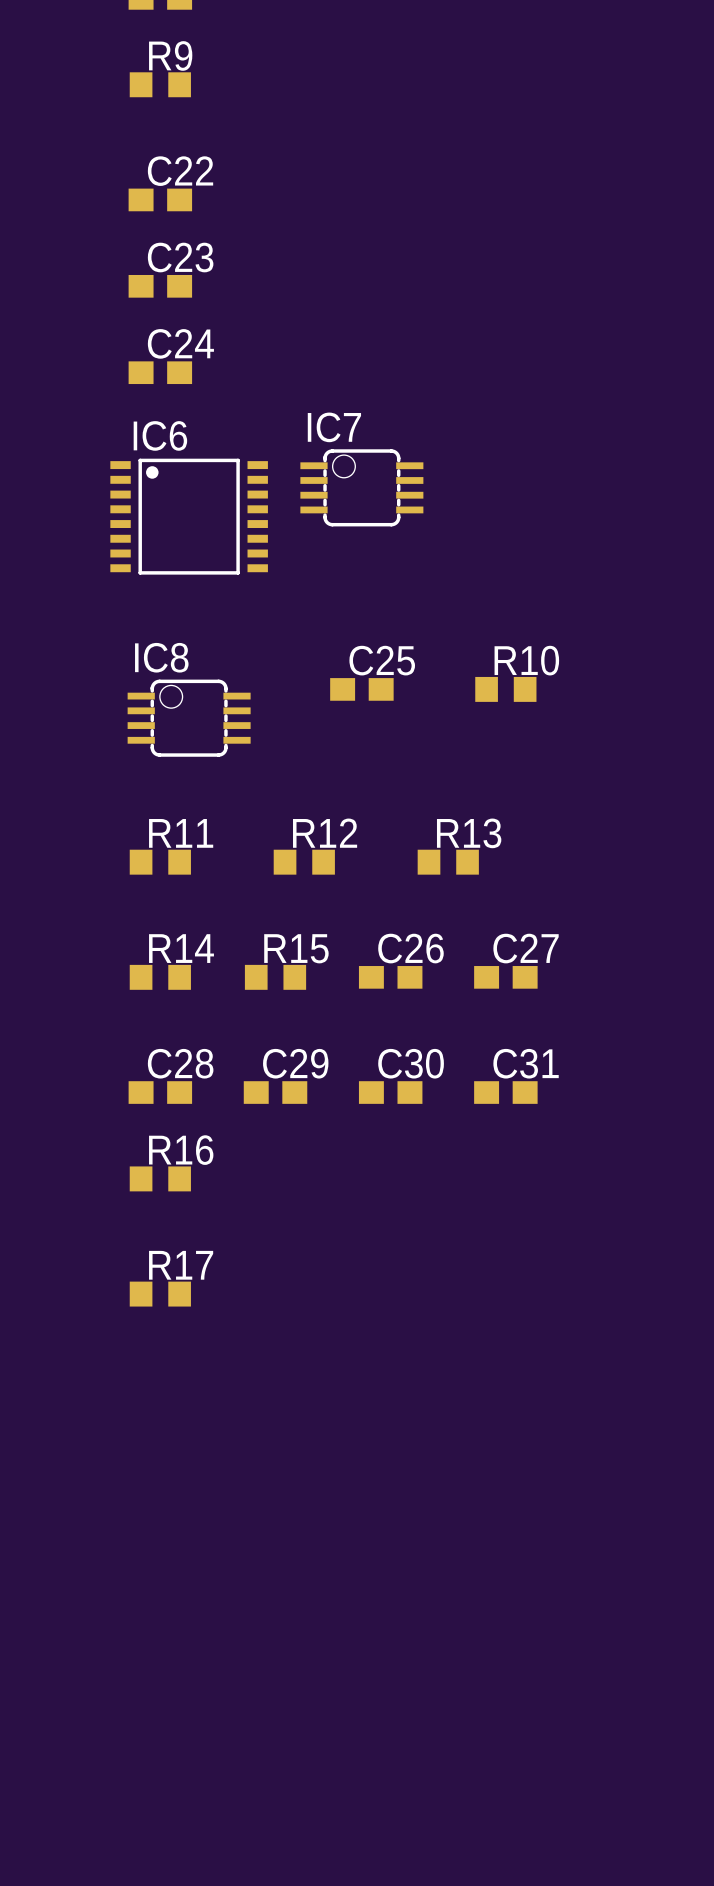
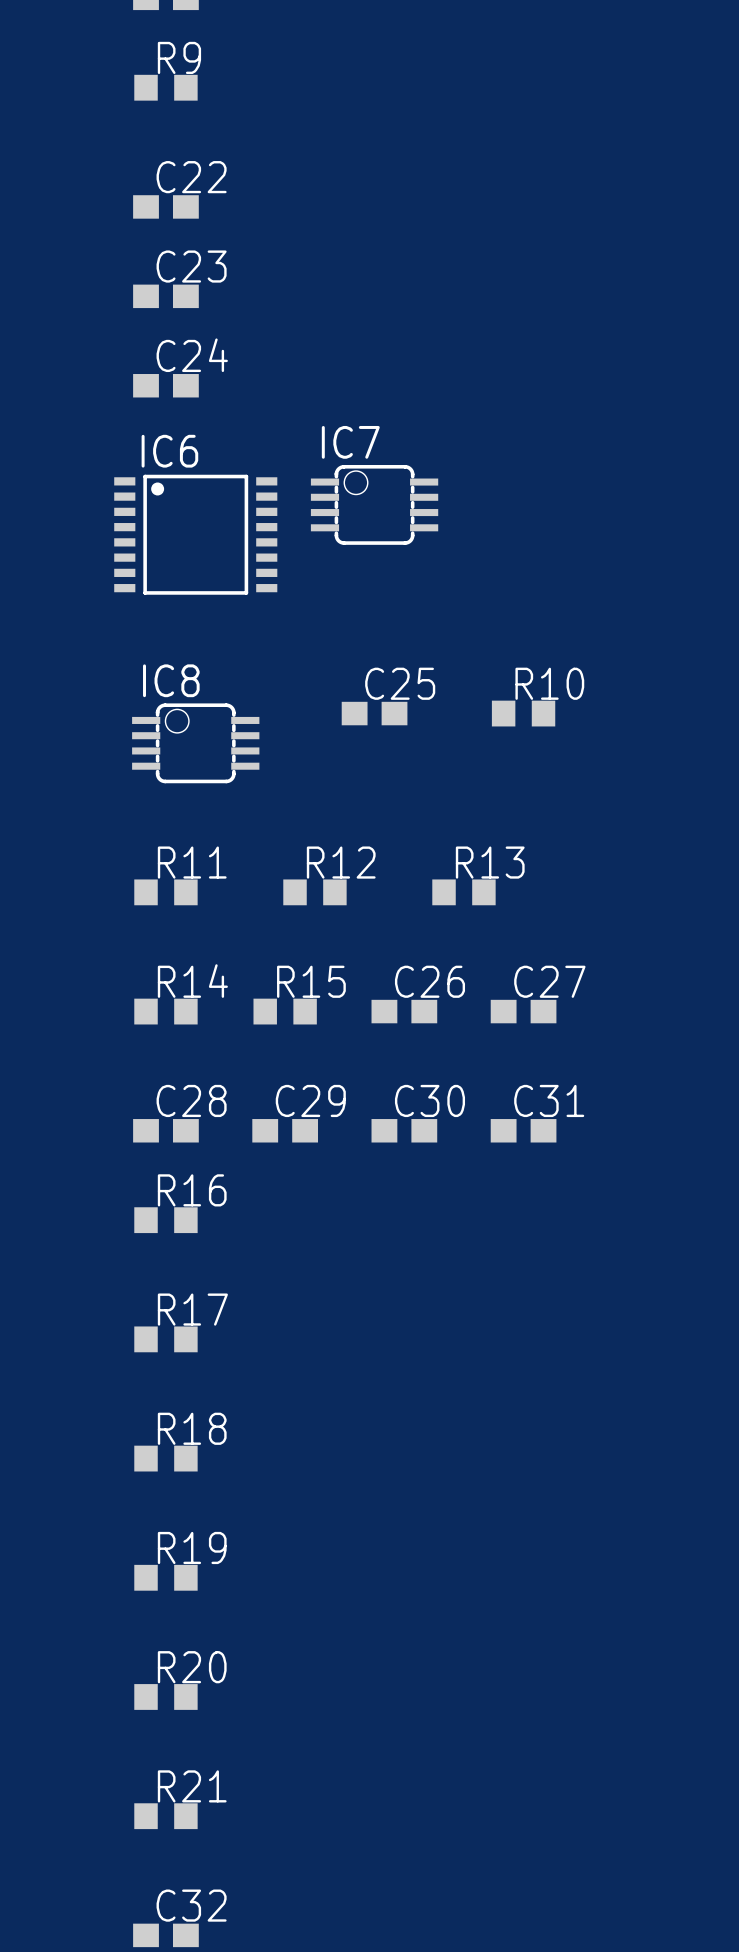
R18: none -> (165, 1458)
R19: none -> (165, 1577)
R20: none -> (165, 1696)
R21: none -> (165, 1816)
C32: none -> (165, 1935)

